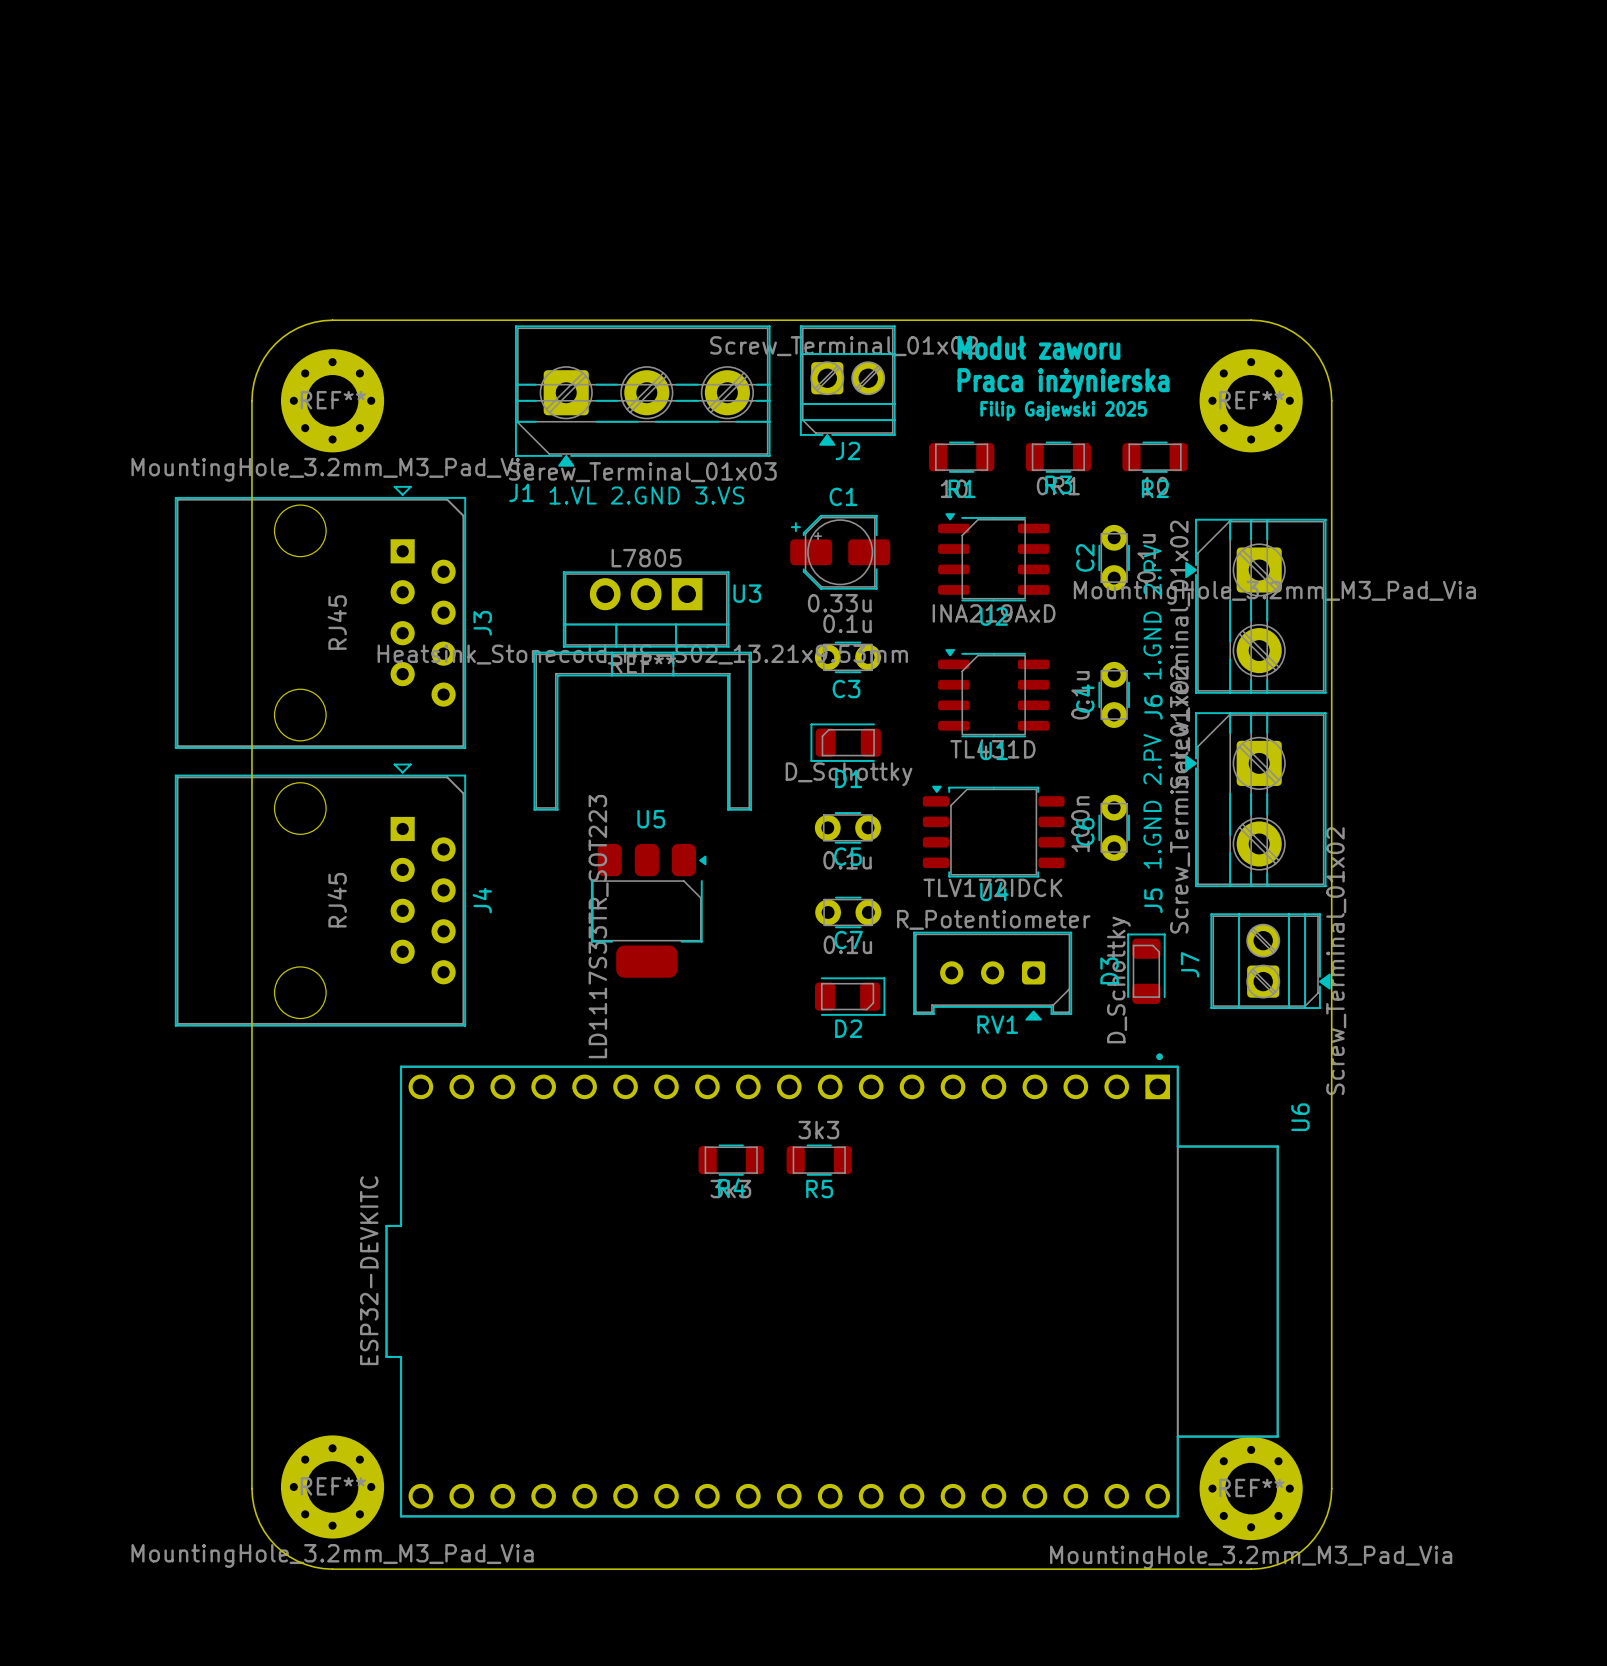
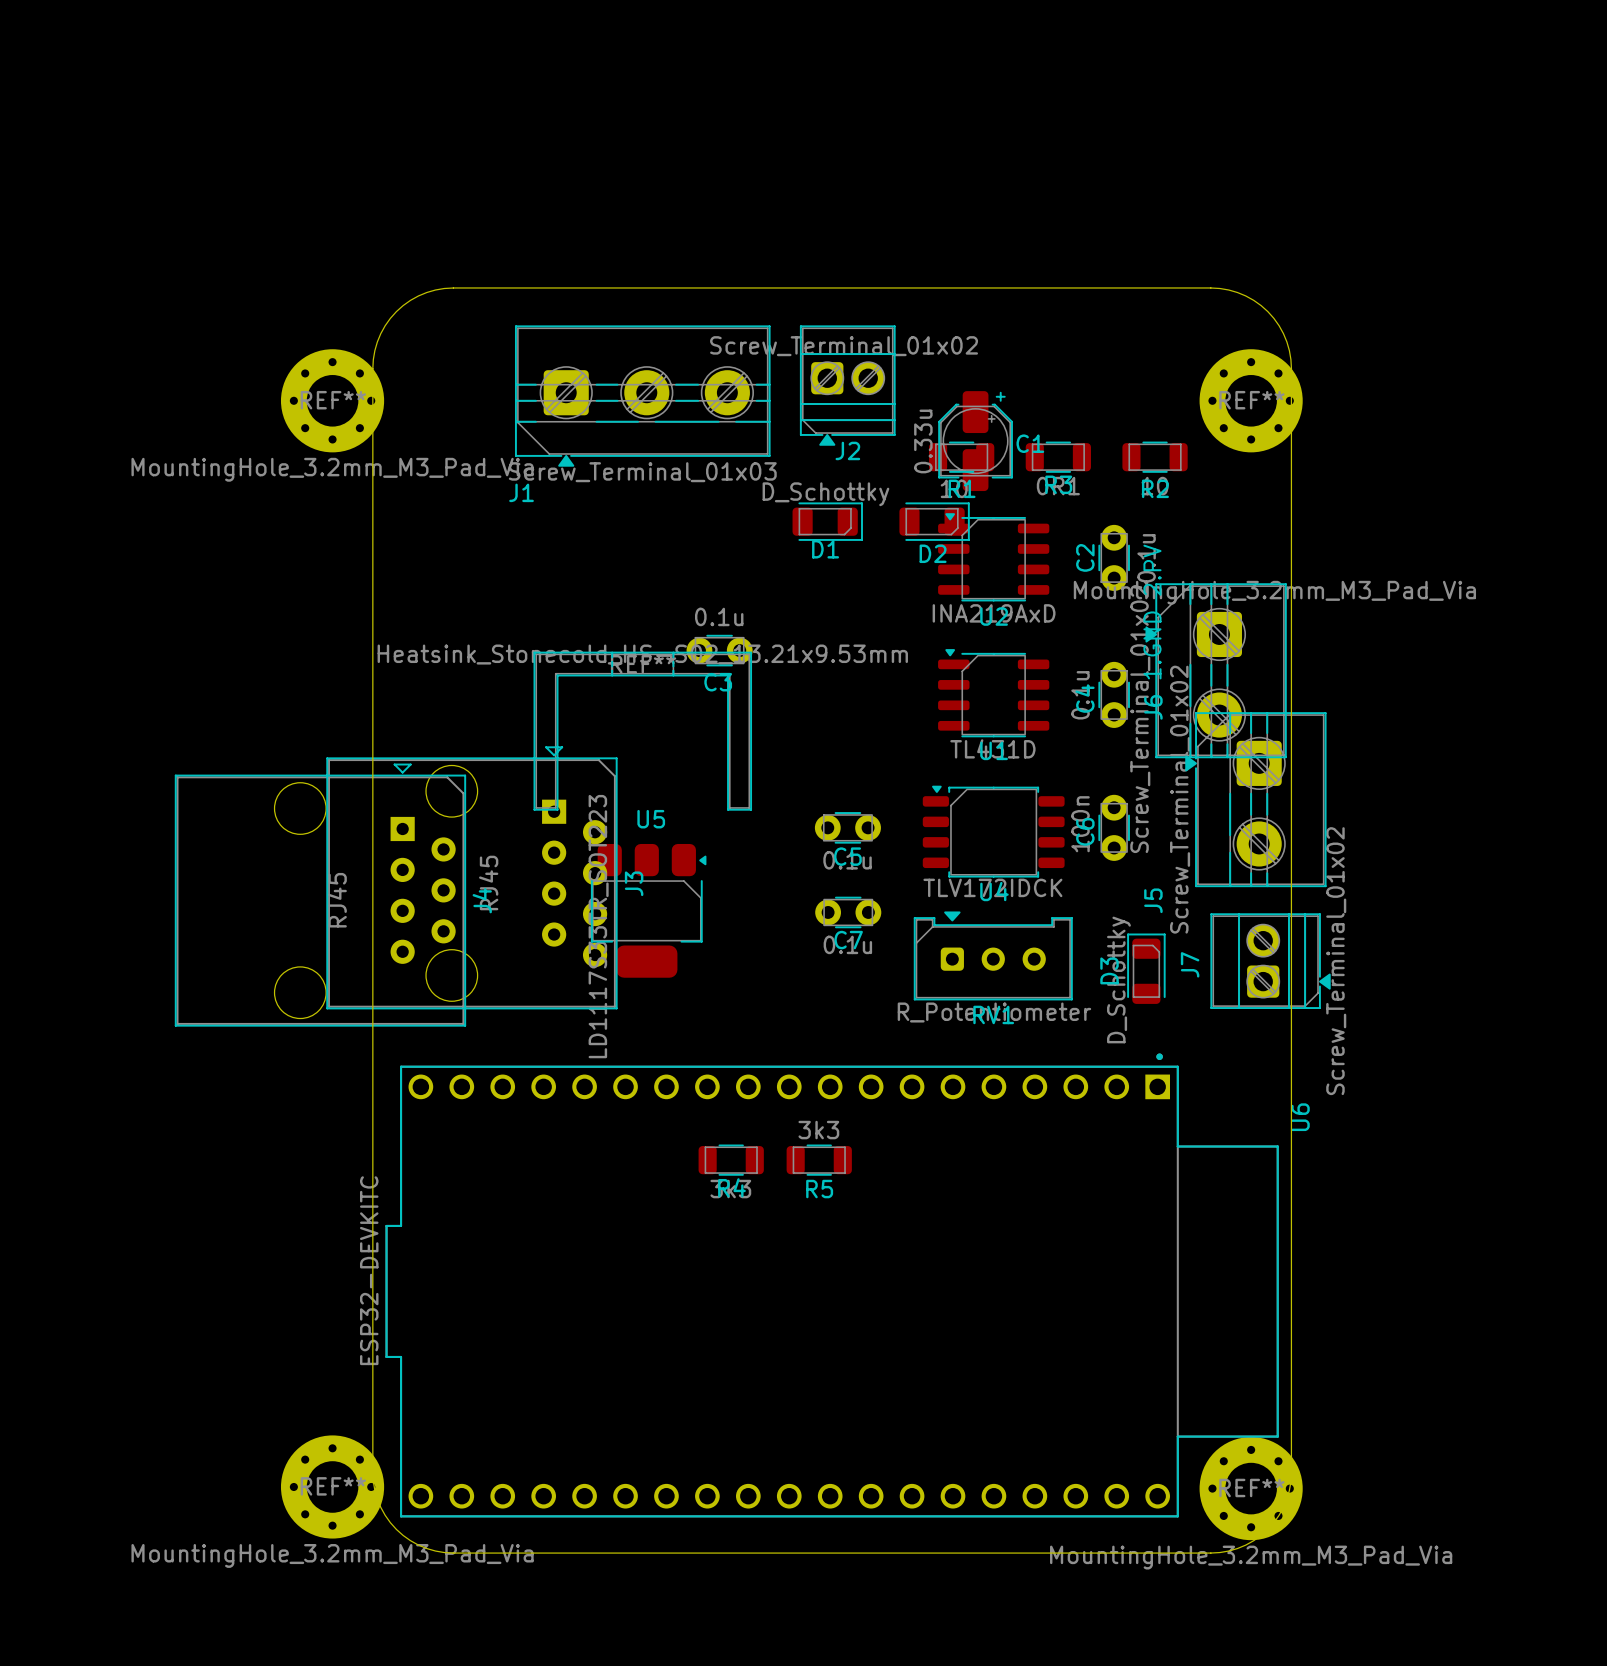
board edge: (332, 320) (1251, 320) (1269, 322) (1286, 328) (1301, 337) (1314, 350) (1327, 374) (1331, 400) (1331, 1488) (1329, 1506) (1323, 1523) (1314, 1538) (1301, 1551) (1277, 1564) (1251, 1569) (332, 1569) (314, 1567) (297, 1561) (282, 1551) (269, 1538) (256, 1515) (251, 1488) (251, 400) (253, 382) (259, 365) (275, 343) (289, 332) (305, 324) (332, 320) -> (453, 287) (426, 292) (410, 300) (396, 311) (385, 325) (377, 341) (372, 368) (372, 1472) (377, 1499) (385, 1515) (396, 1529) (418, 1545) (435, 1551) (453, 1553) (1210, 1553) (1237, 1548) (1253, 1540) (1267, 1529) (1279, 1515) (1289, 1490) (1291, 1472) (1291, 368) (1289, 350) (1279, 325) (1267, 311) (1245, 295) (1228, 290) (1210, 287) (453, 287)
text: Moduł zaworu (1038, 347) -> none
text: Praca inżynierska (1063, 383) -> none
text: Filip Gajewski 2025 (1063, 411) -> none
text: 1.VL 2.GND 3.VS (646, 495) -> none
C1 rotation: 0° (840, 552) -> 90° clockwise (975, 441)
C1 position: (840, 552) -> (975, 441)
J6 position: (1255, 606) -> (1216, 670)
U3: L7805 (646, 609) -> none
J3 position: (320, 617) -> (471, 877)
C3 position: (847, 657) -> (719, 650)
D1 rotation: 0° (845, 742) -> 180° (827, 521)
D1 position: (845, 742) -> (827, 521)
text: 1.GND 2.PV (1152, 801) -> none
RV1 rotation: 0° (992, 976) -> 180° (993, 955)
D2 position: (850, 996) -> (934, 521)

